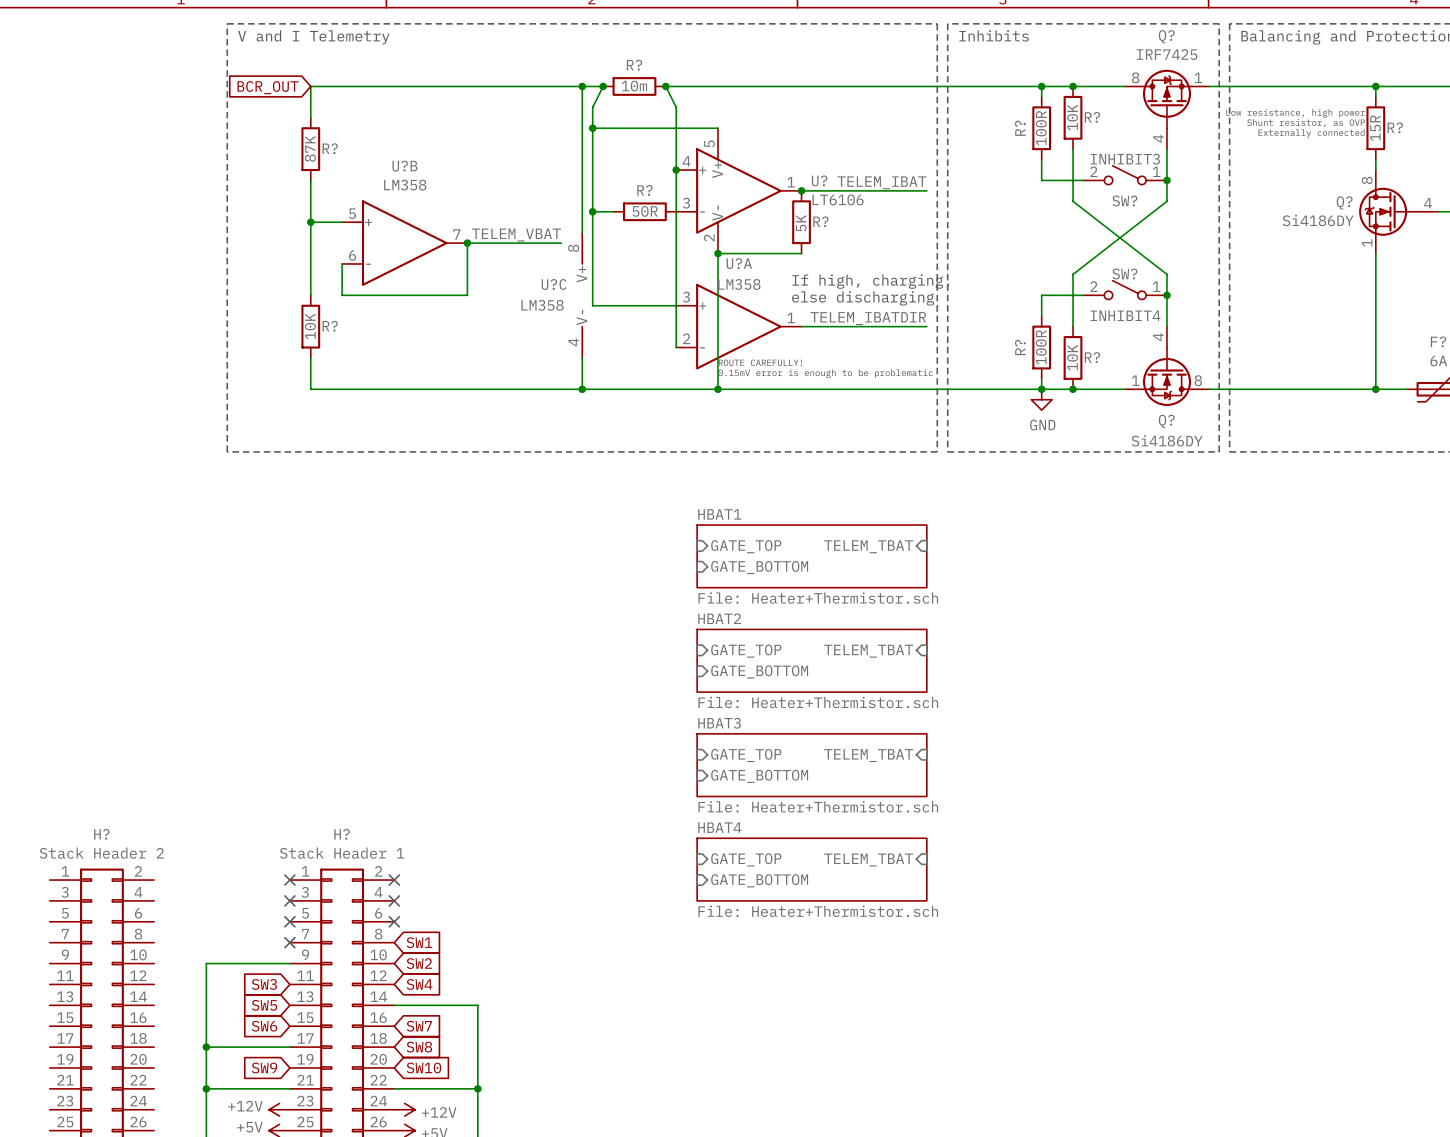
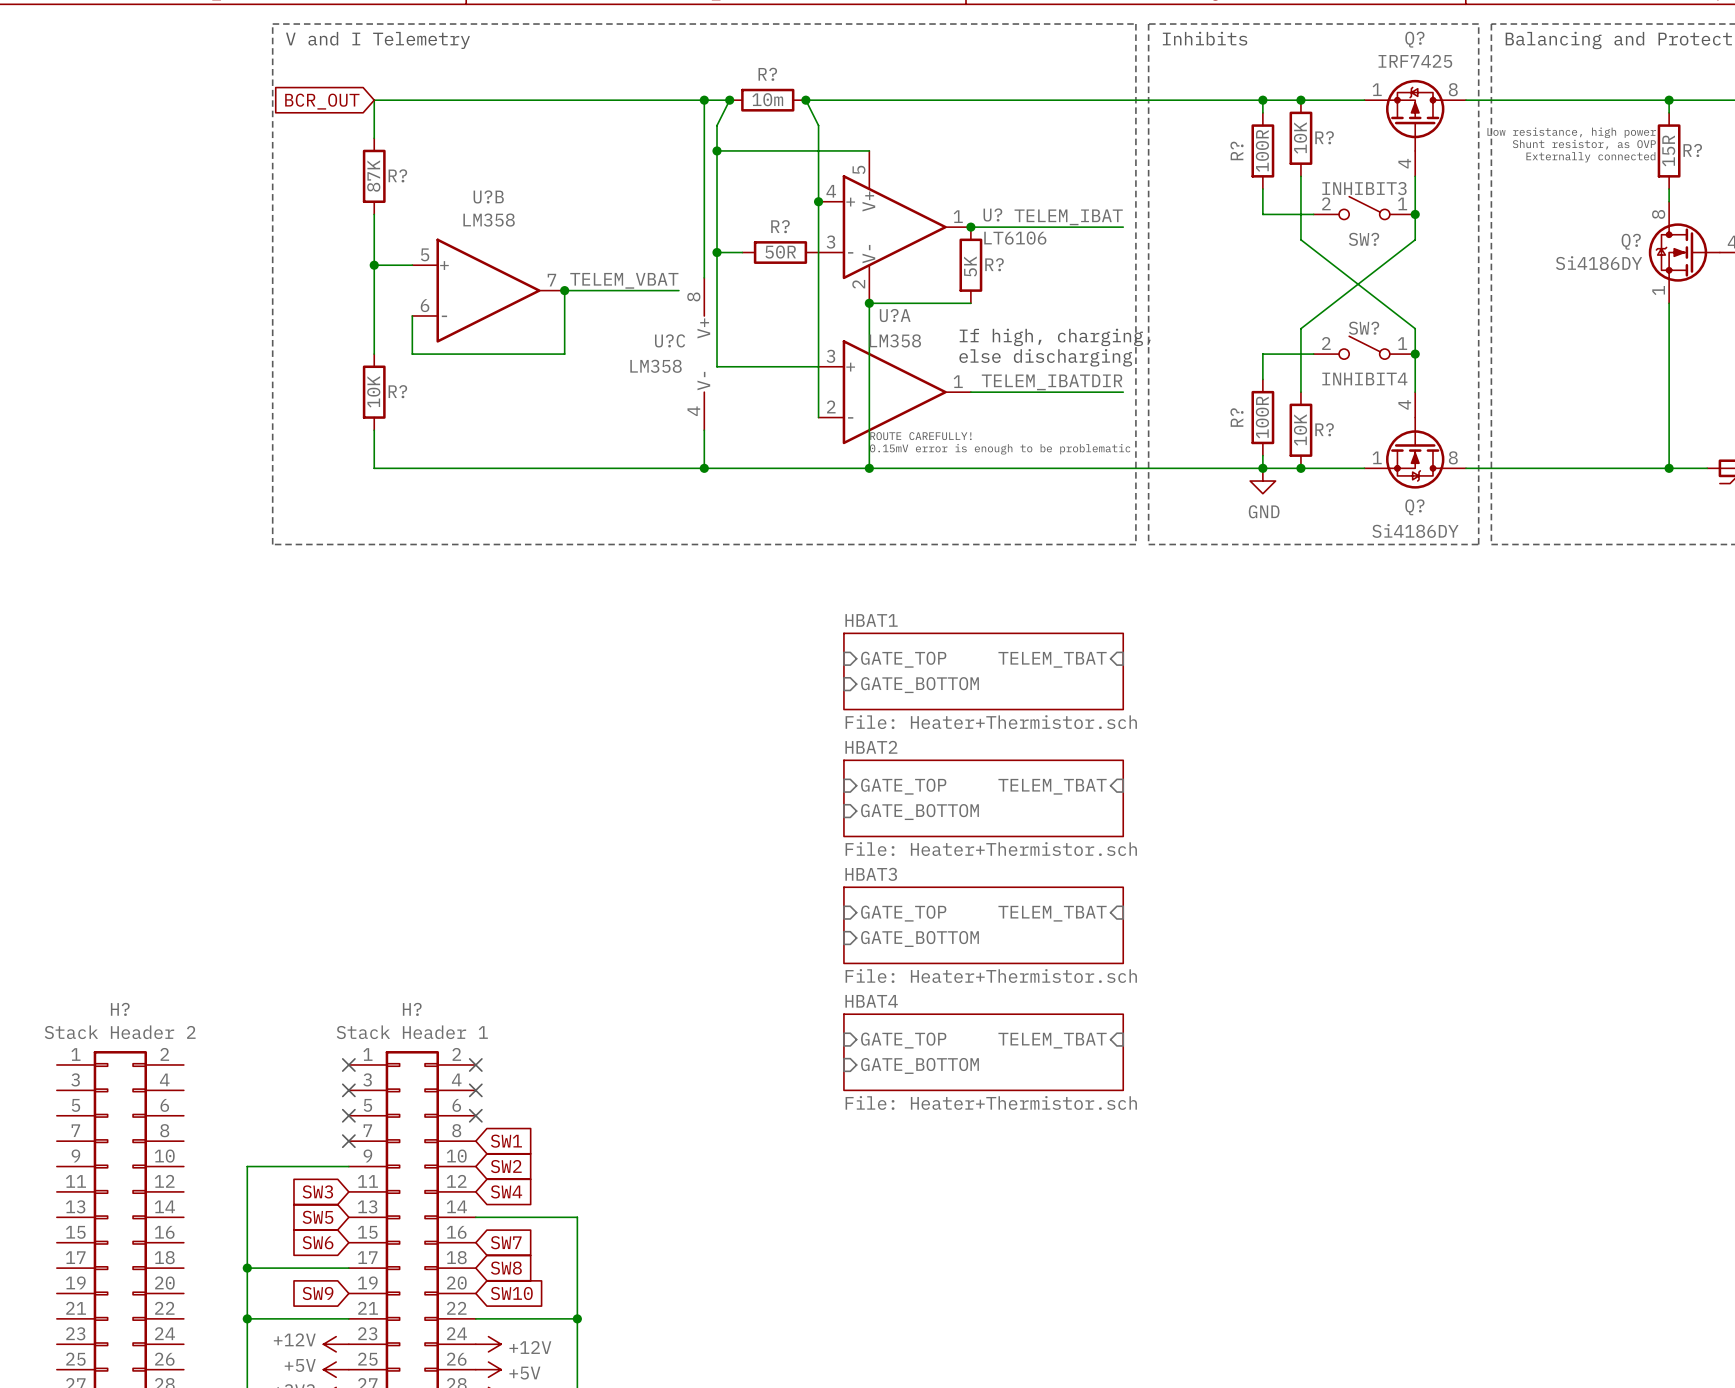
Q? flip: as is (1166, 99) -> left-right (1415, 115)

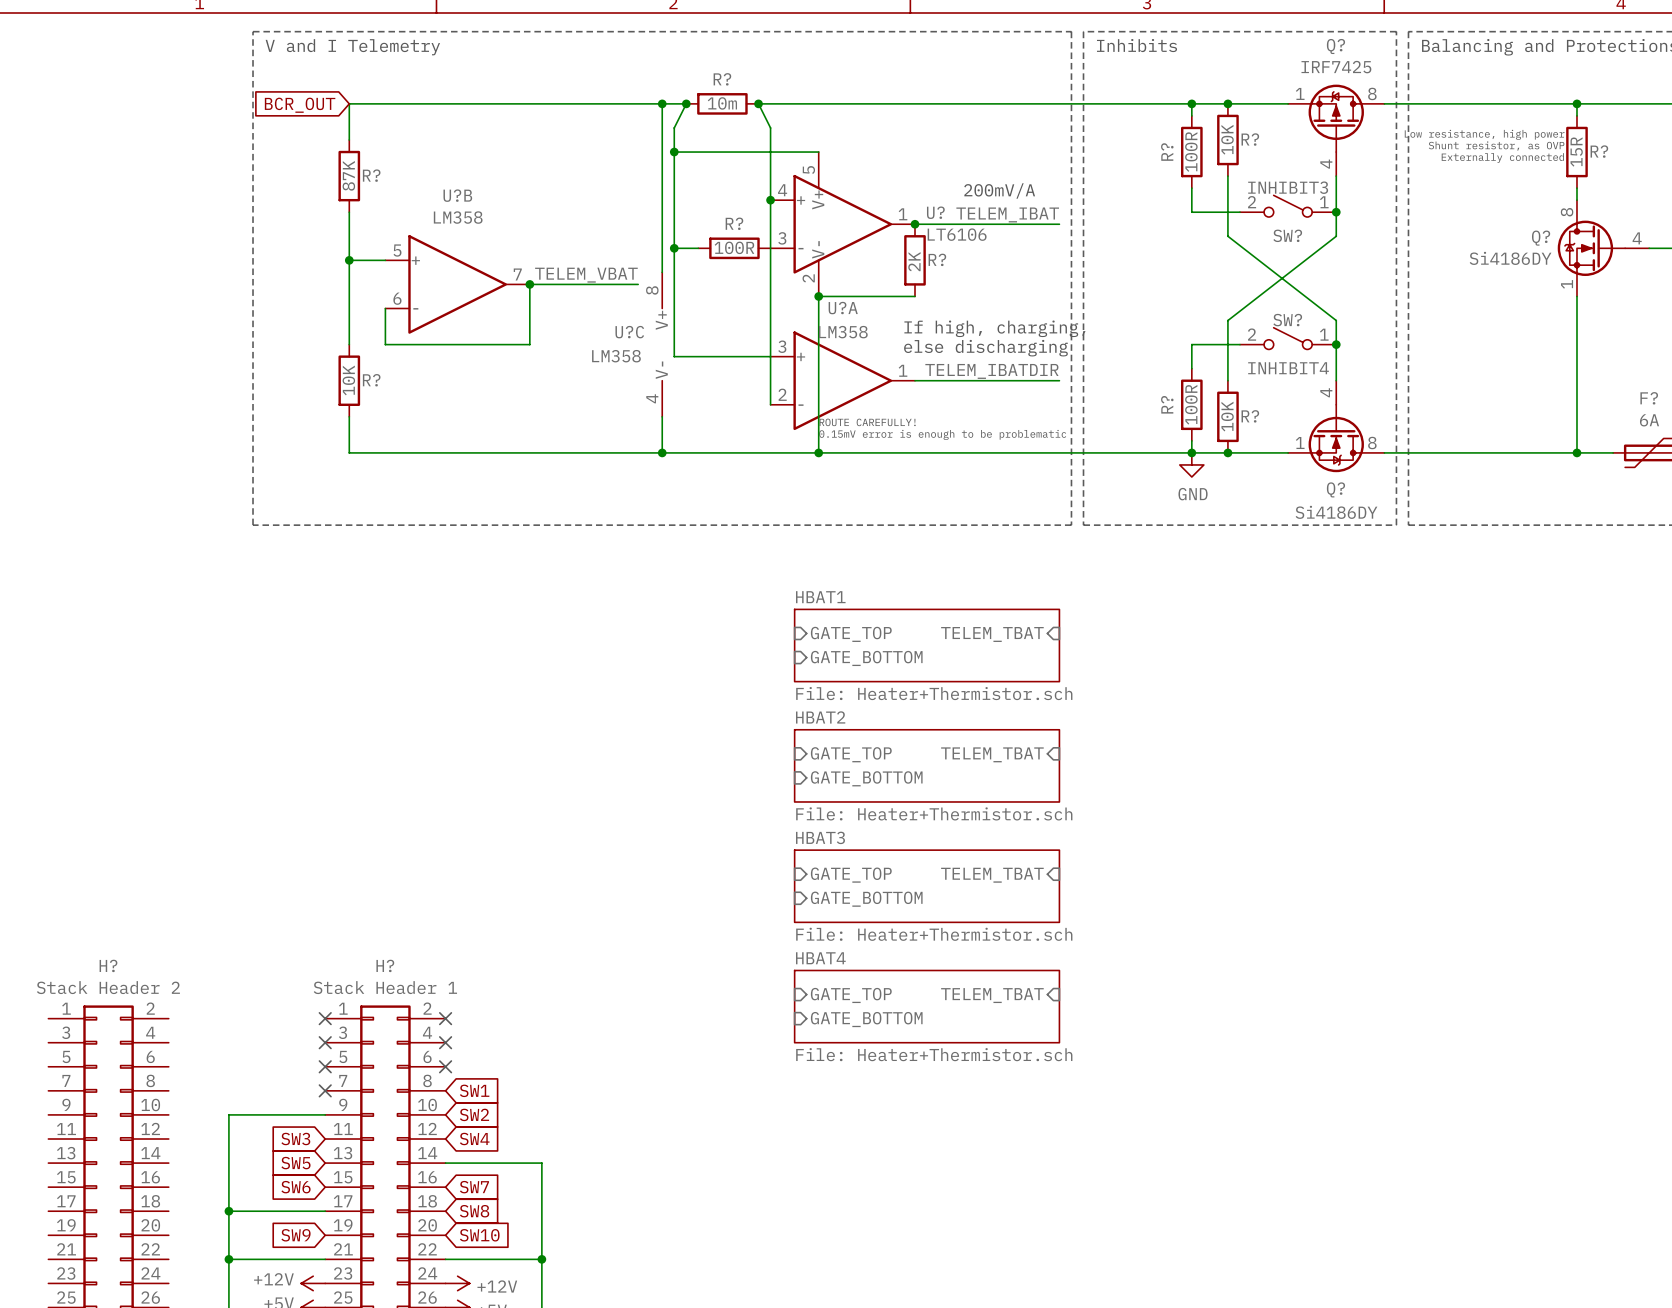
text: none -> 200mV/A (999, 190)
R? value: 50R (780, 252) -> 100R (734, 247)
R? value: 5K (970, 266) -> 2K (914, 261)

